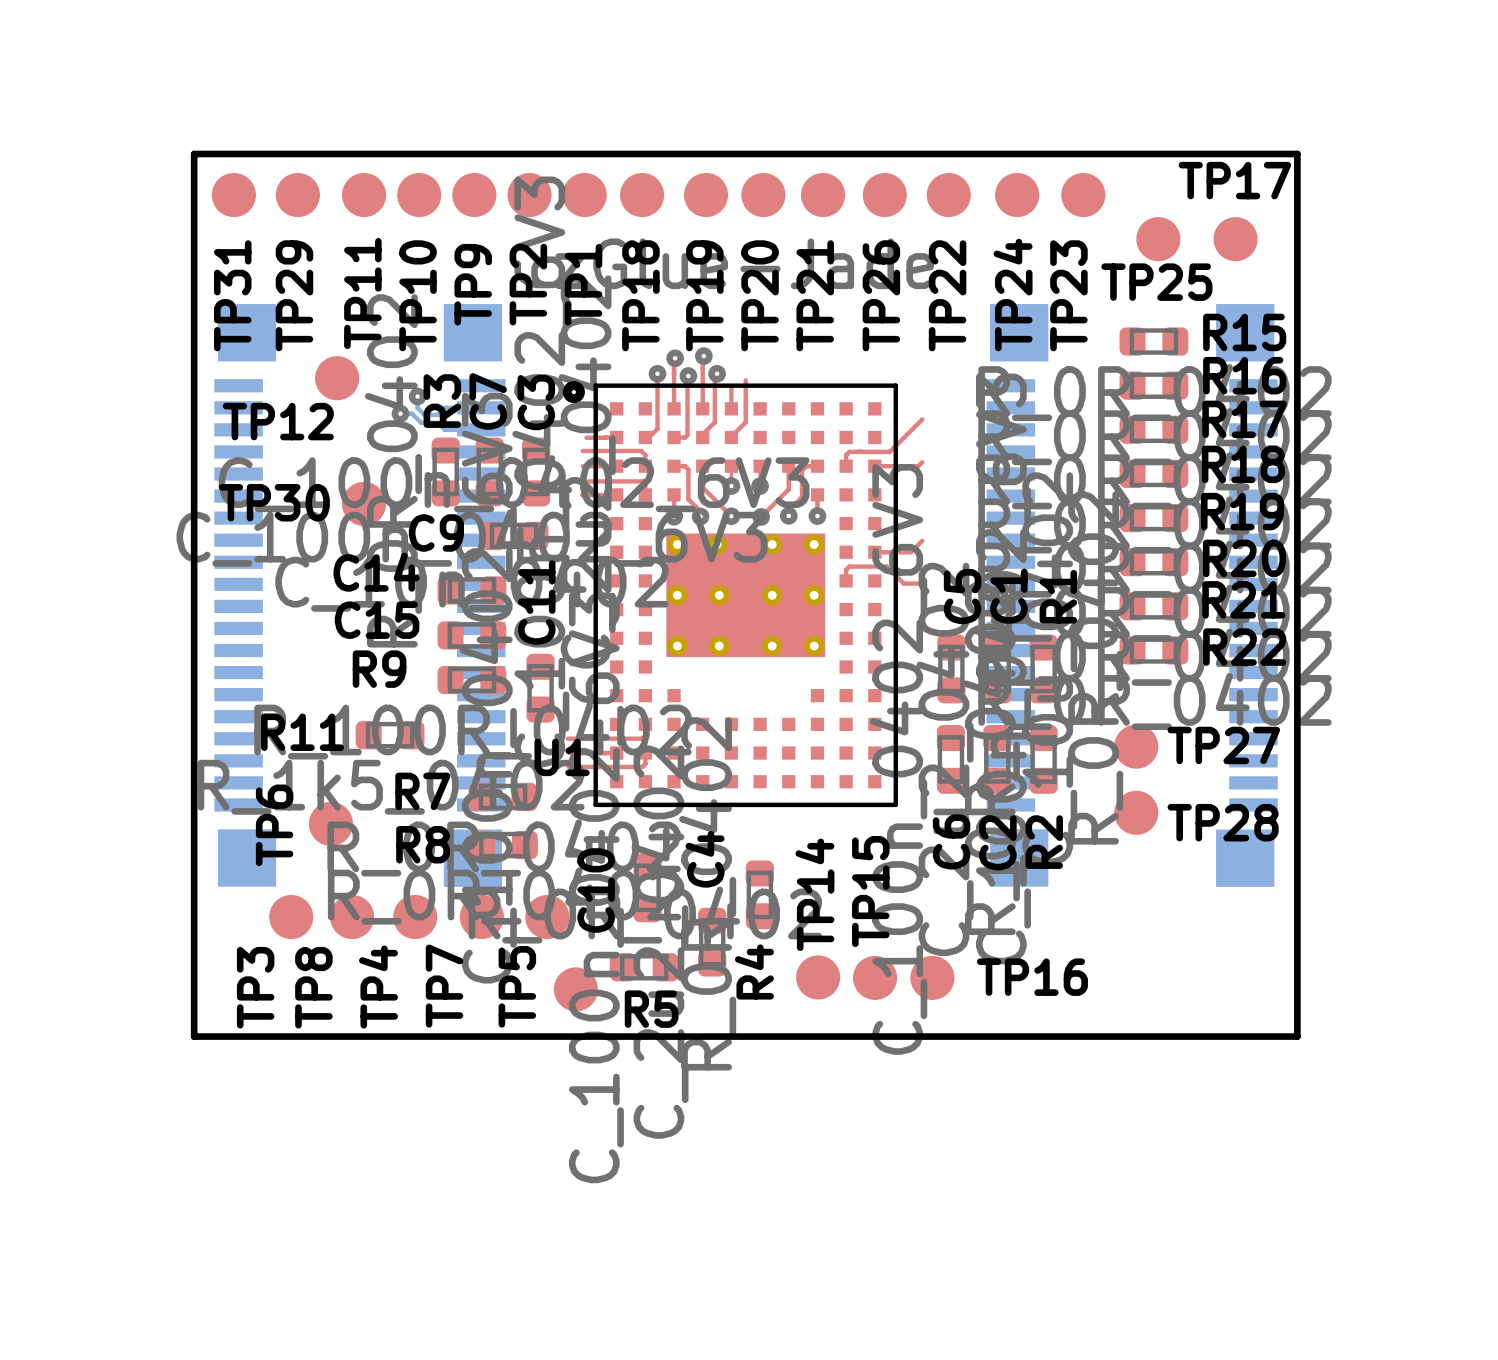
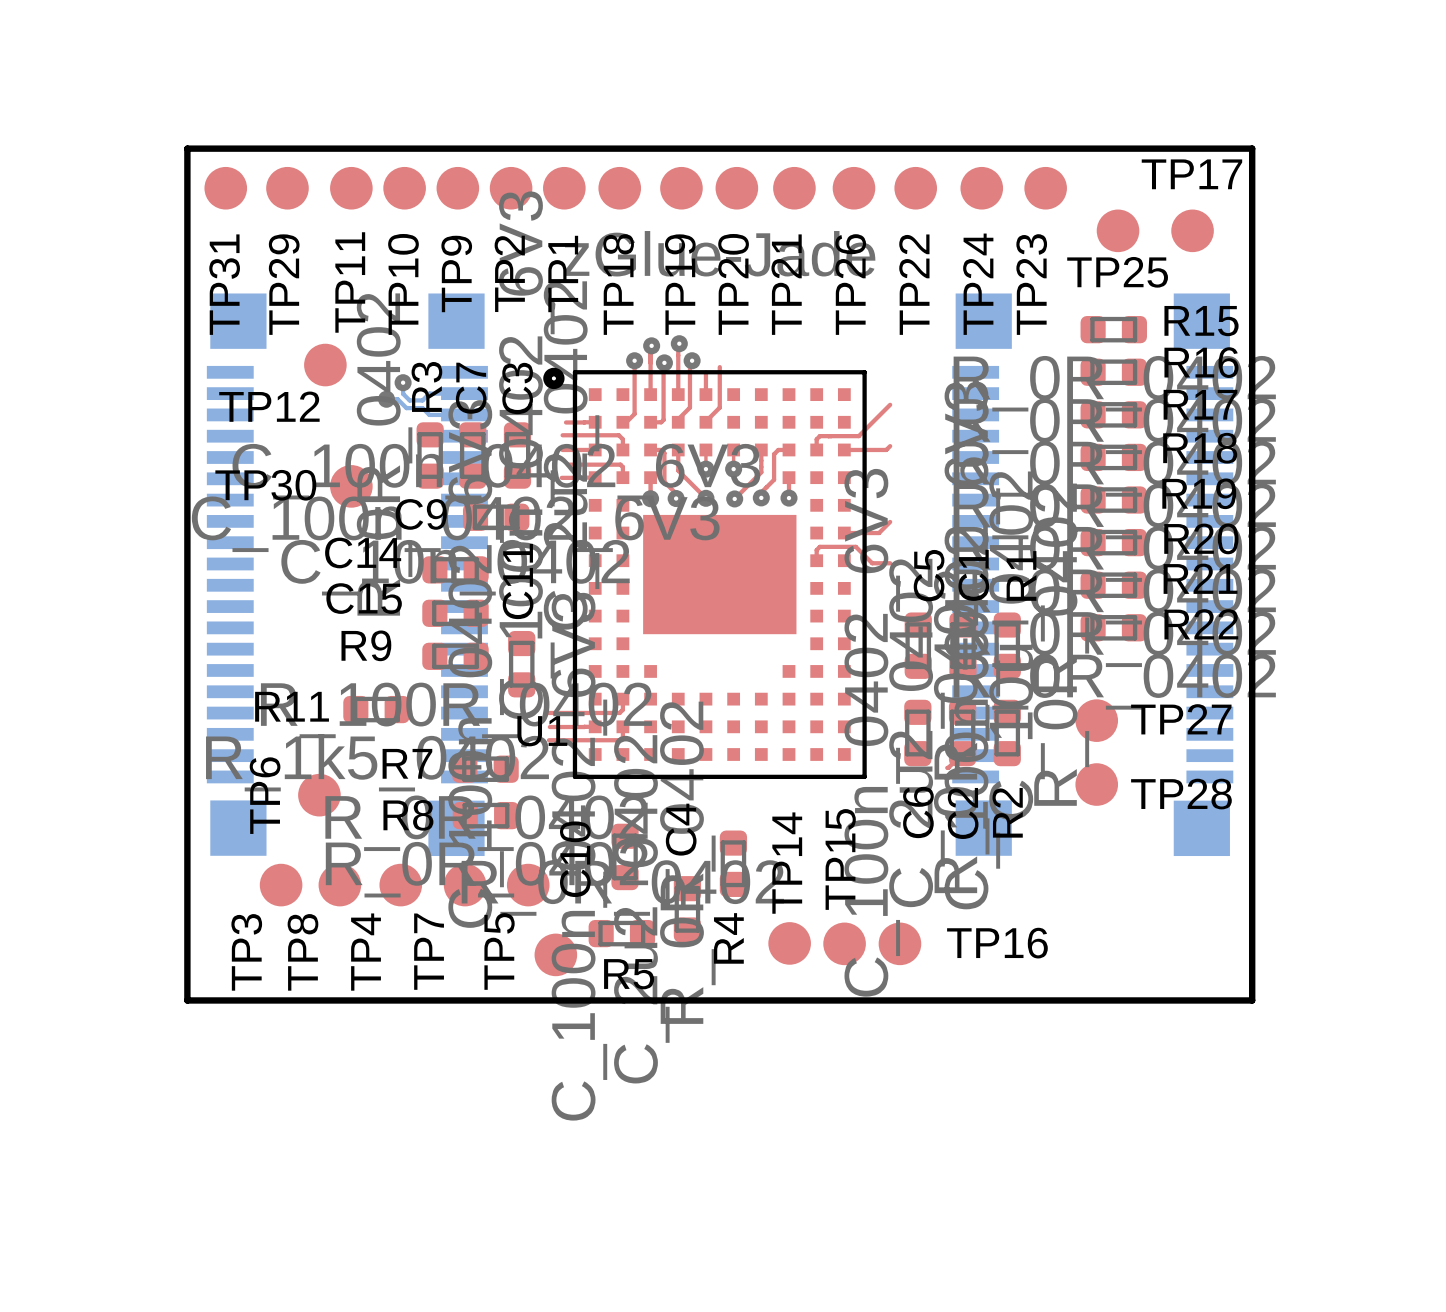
U1 footprint: [593, 383, 898, 808] -> [572, 370, 867, 779]

